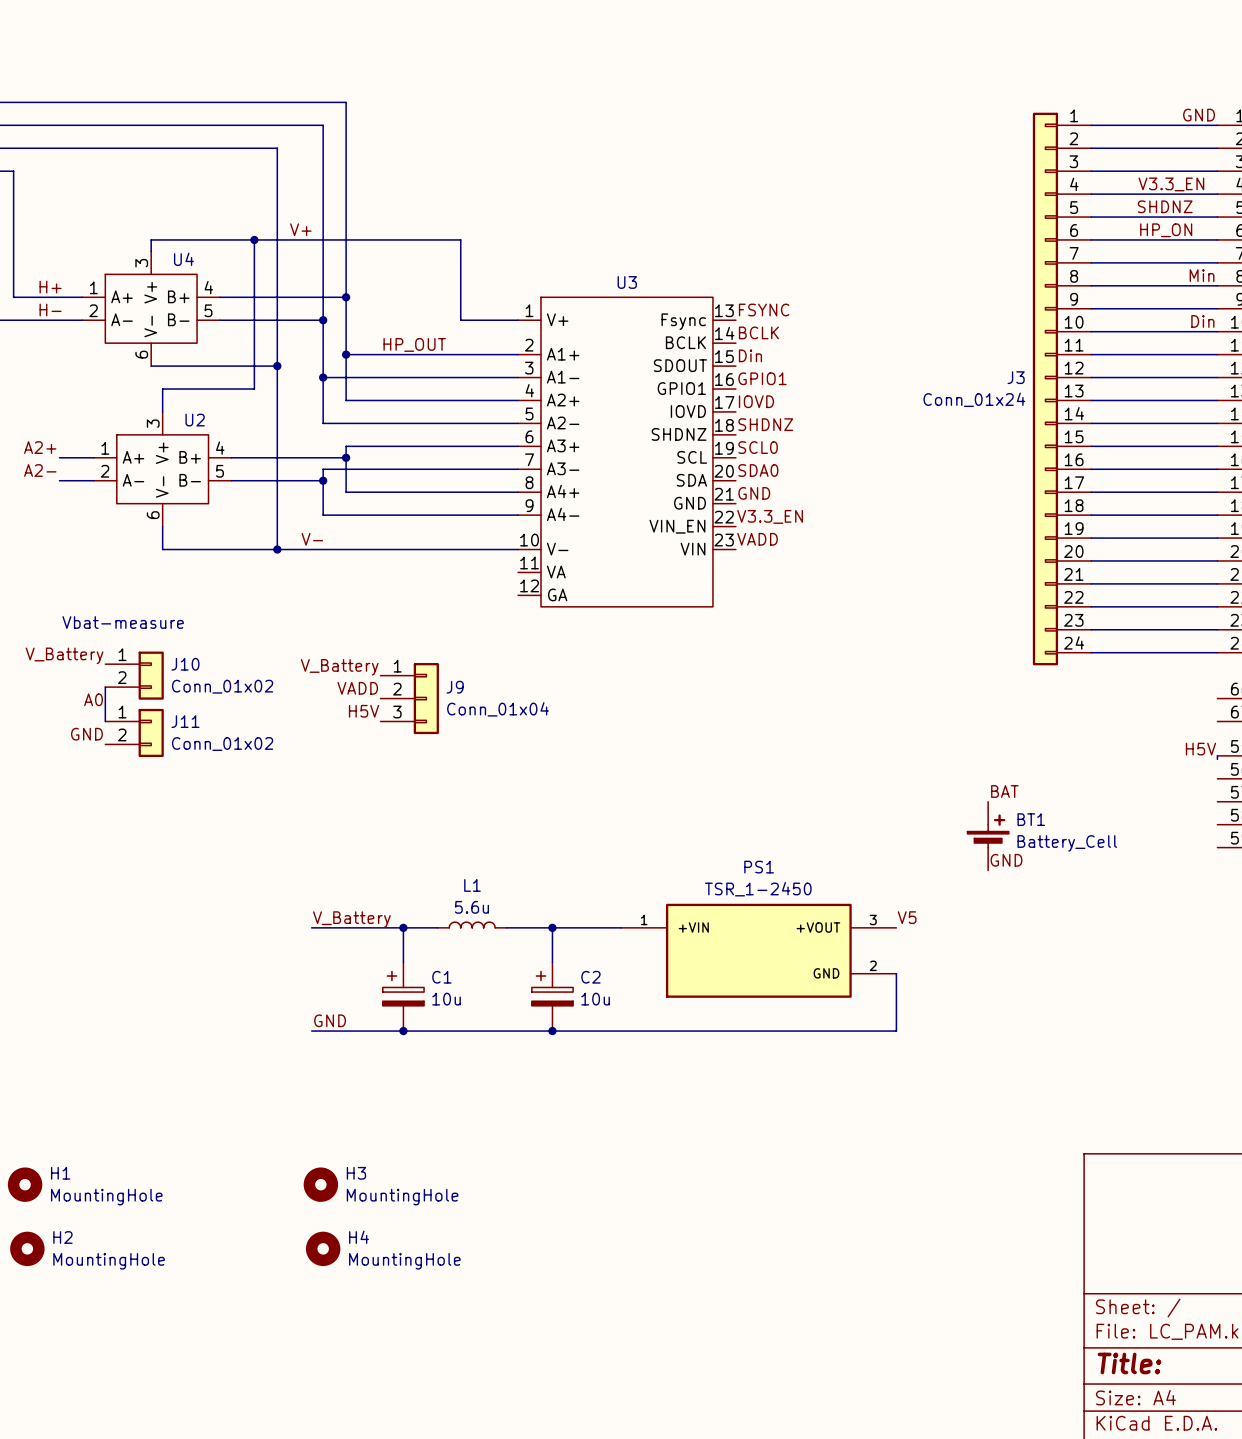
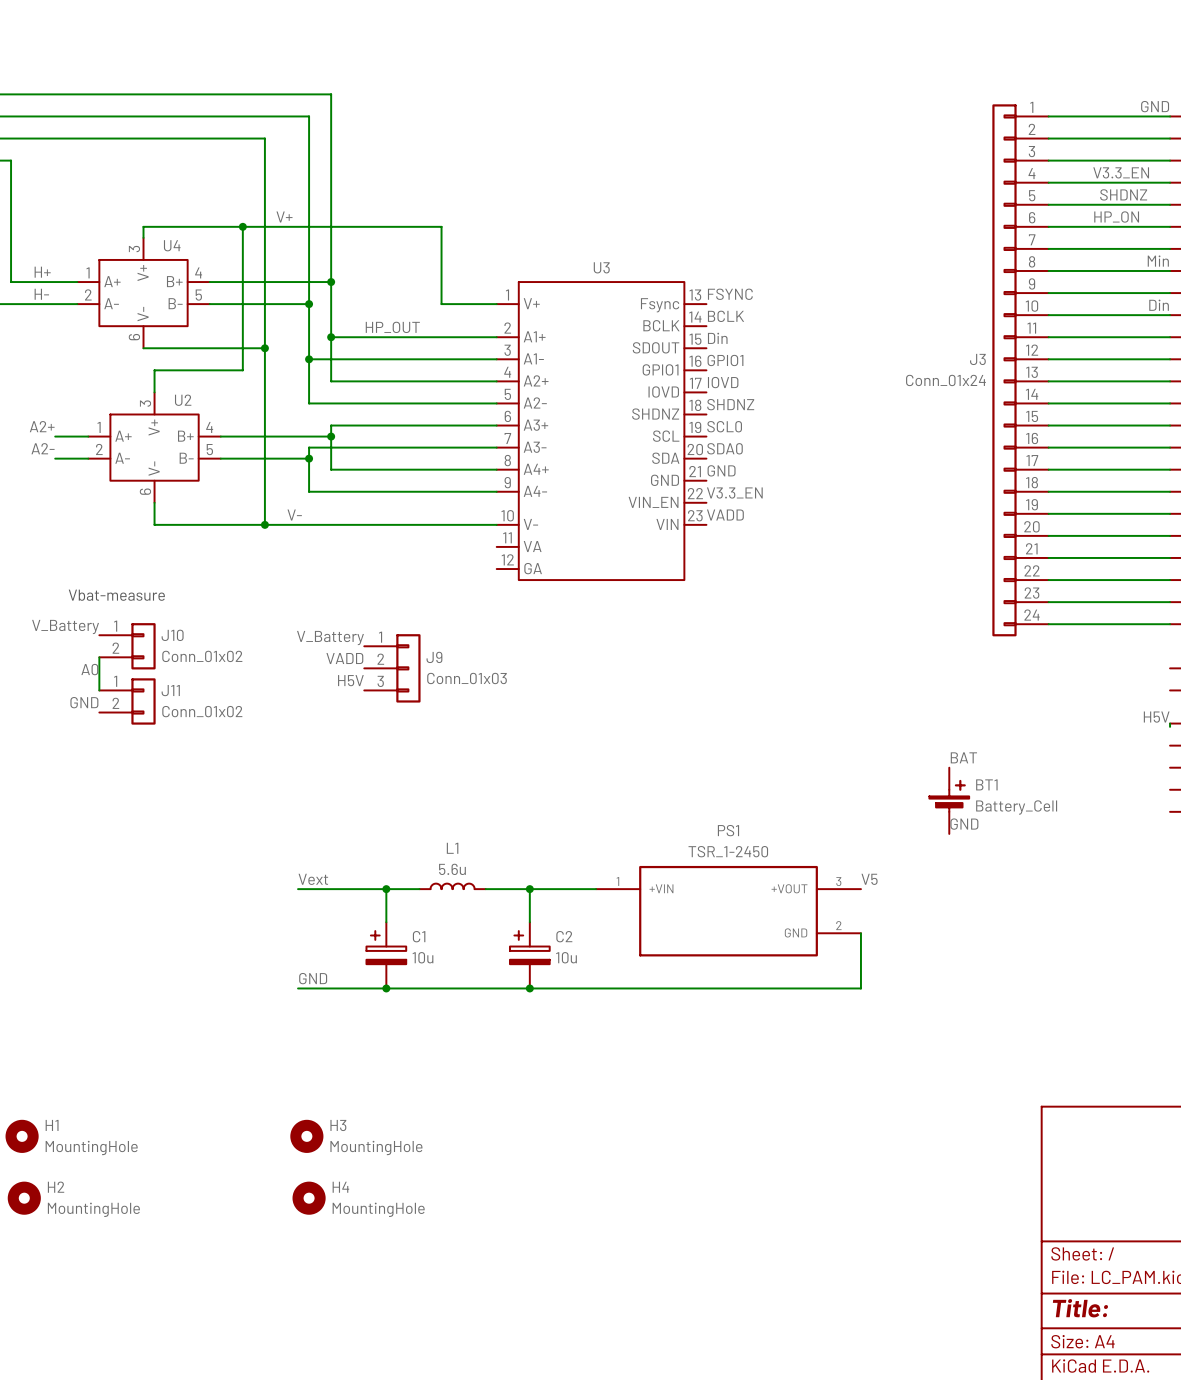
J9 value: Conn_01x04 (498, 709) -> Conn_01x03 (467, 678)
label: V_Battery (351, 919) -> Vext (313, 879)

